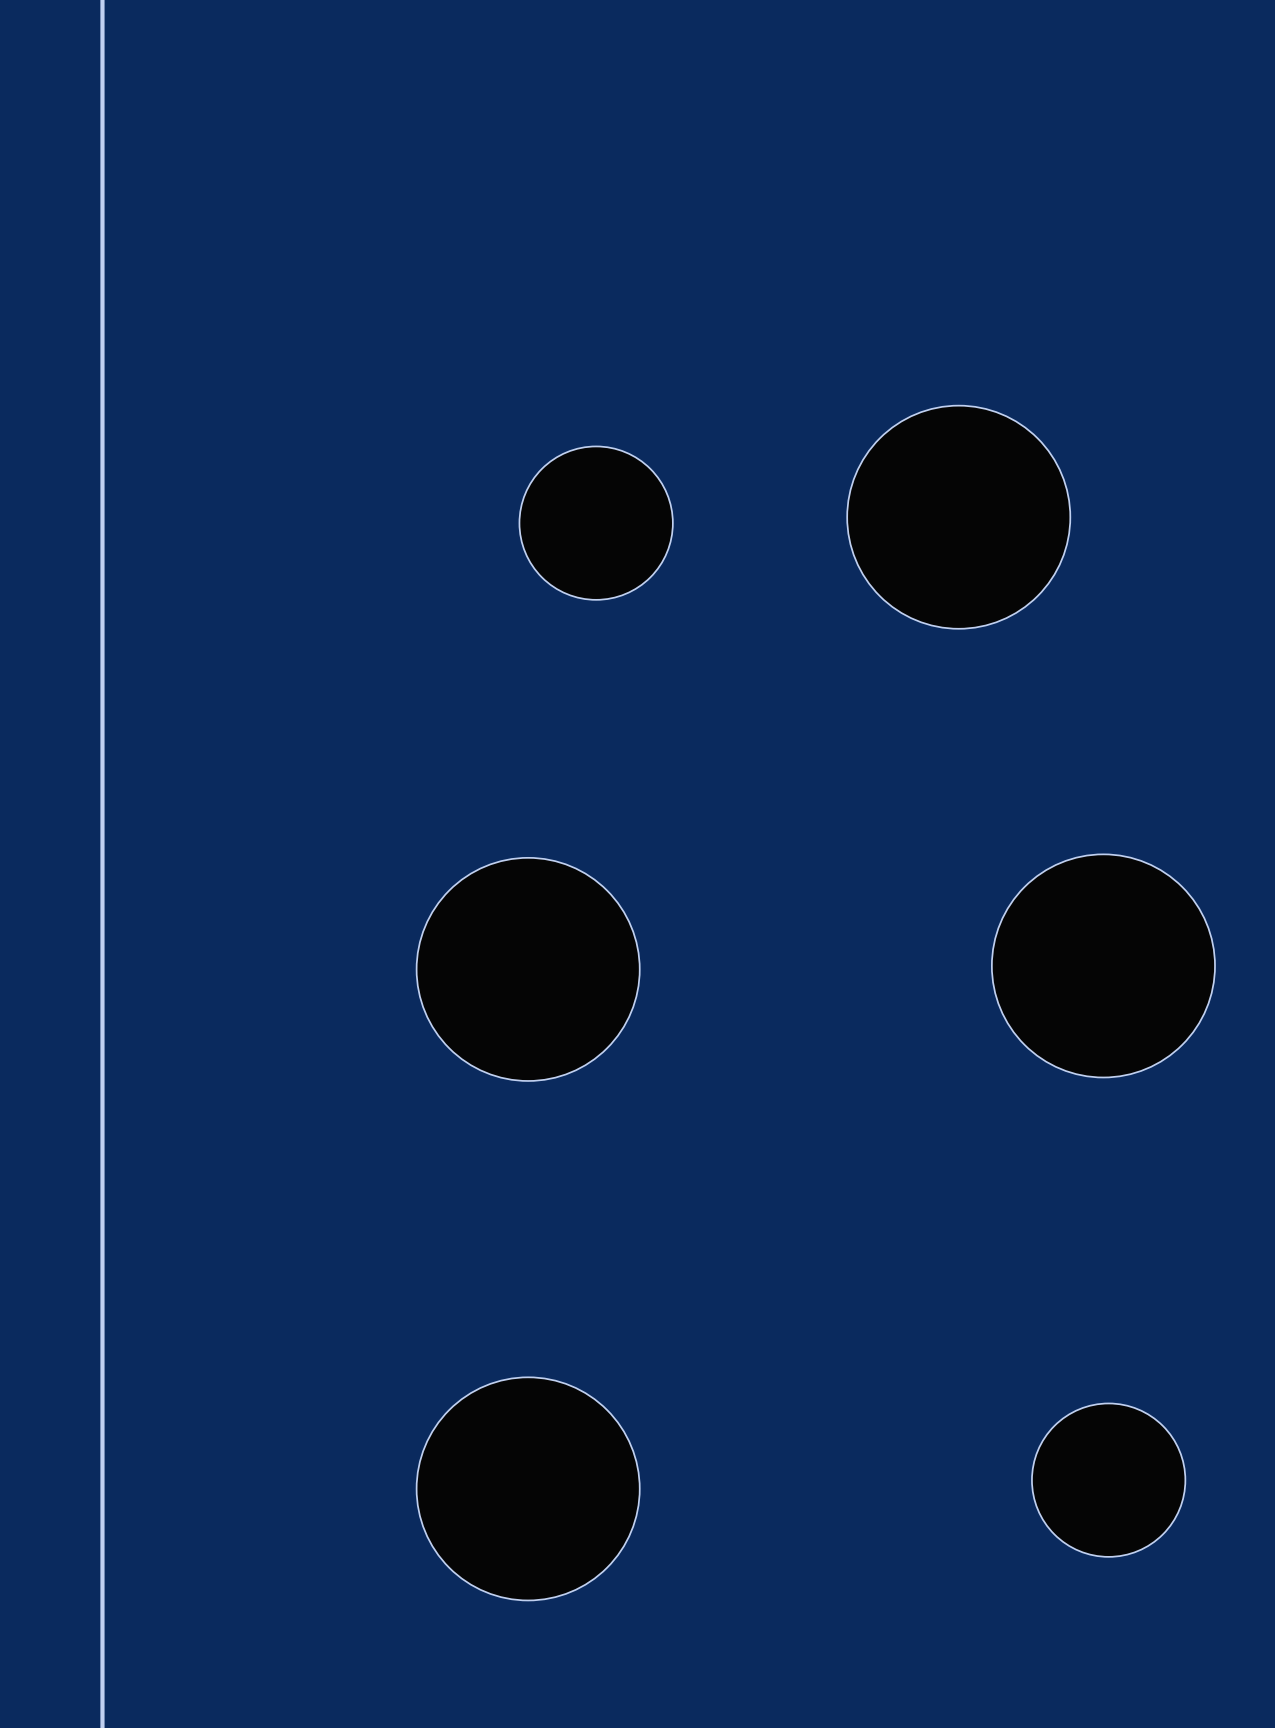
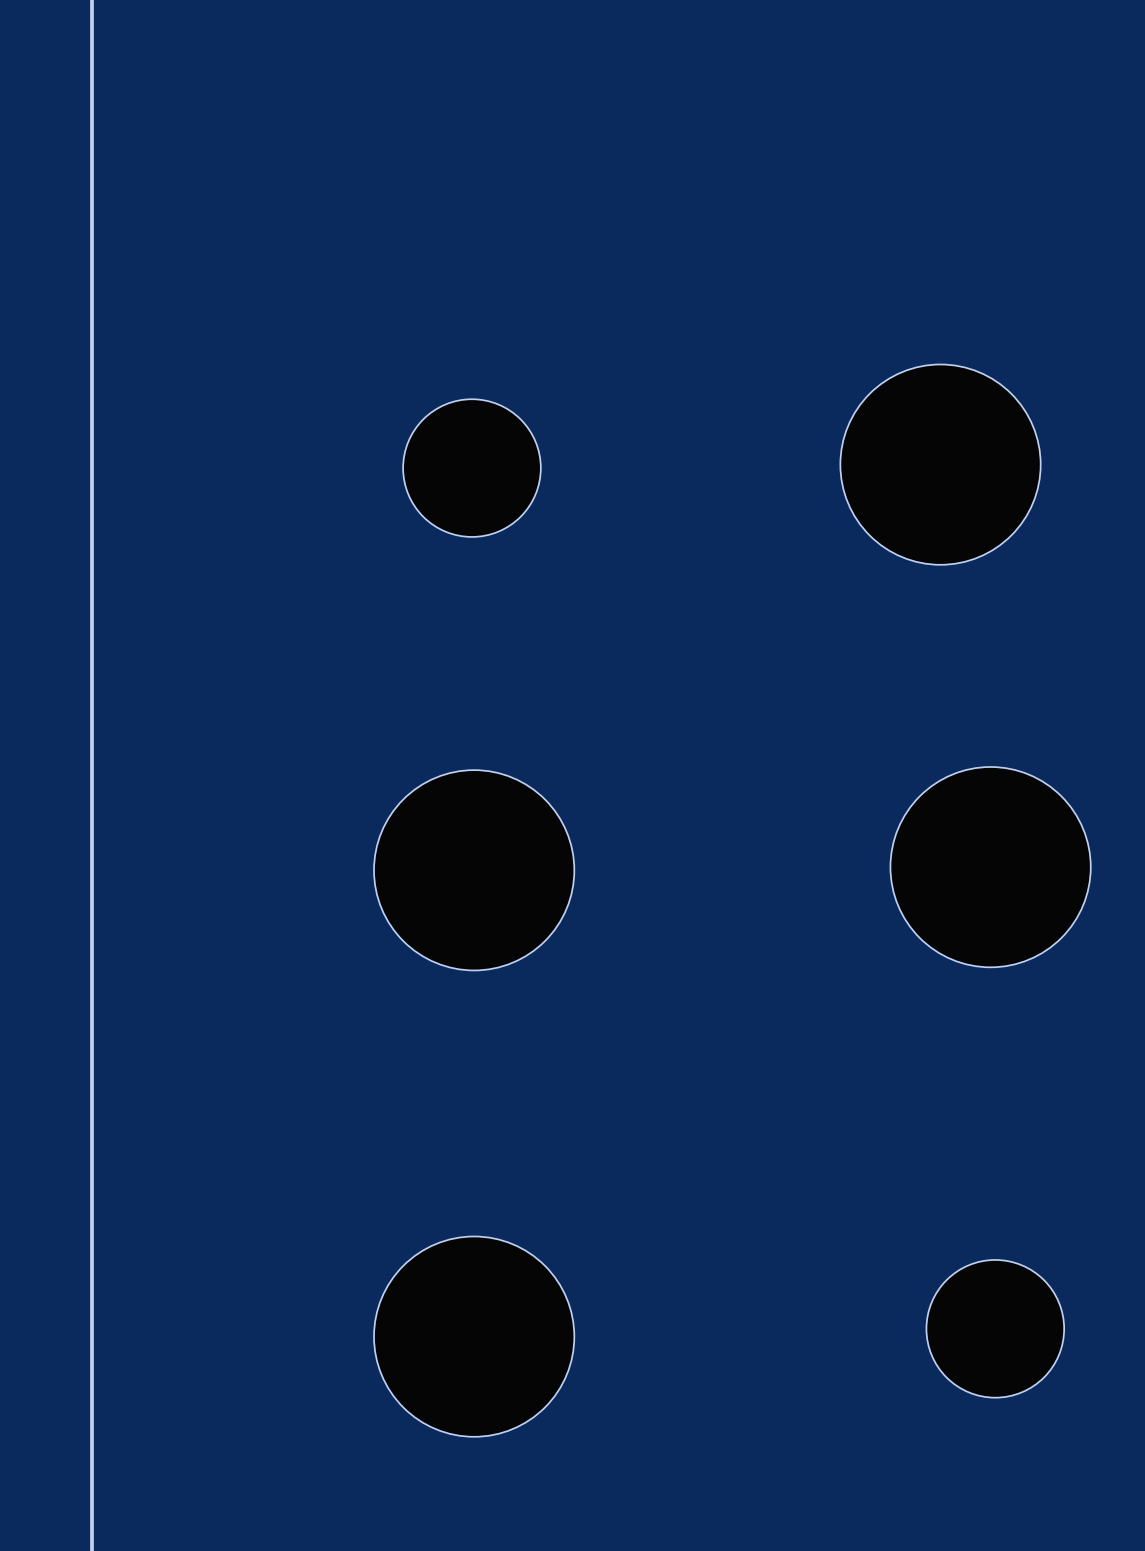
part position: (958, 517) -> (940, 464)
part position: (596, 523) -> (471, 468)

